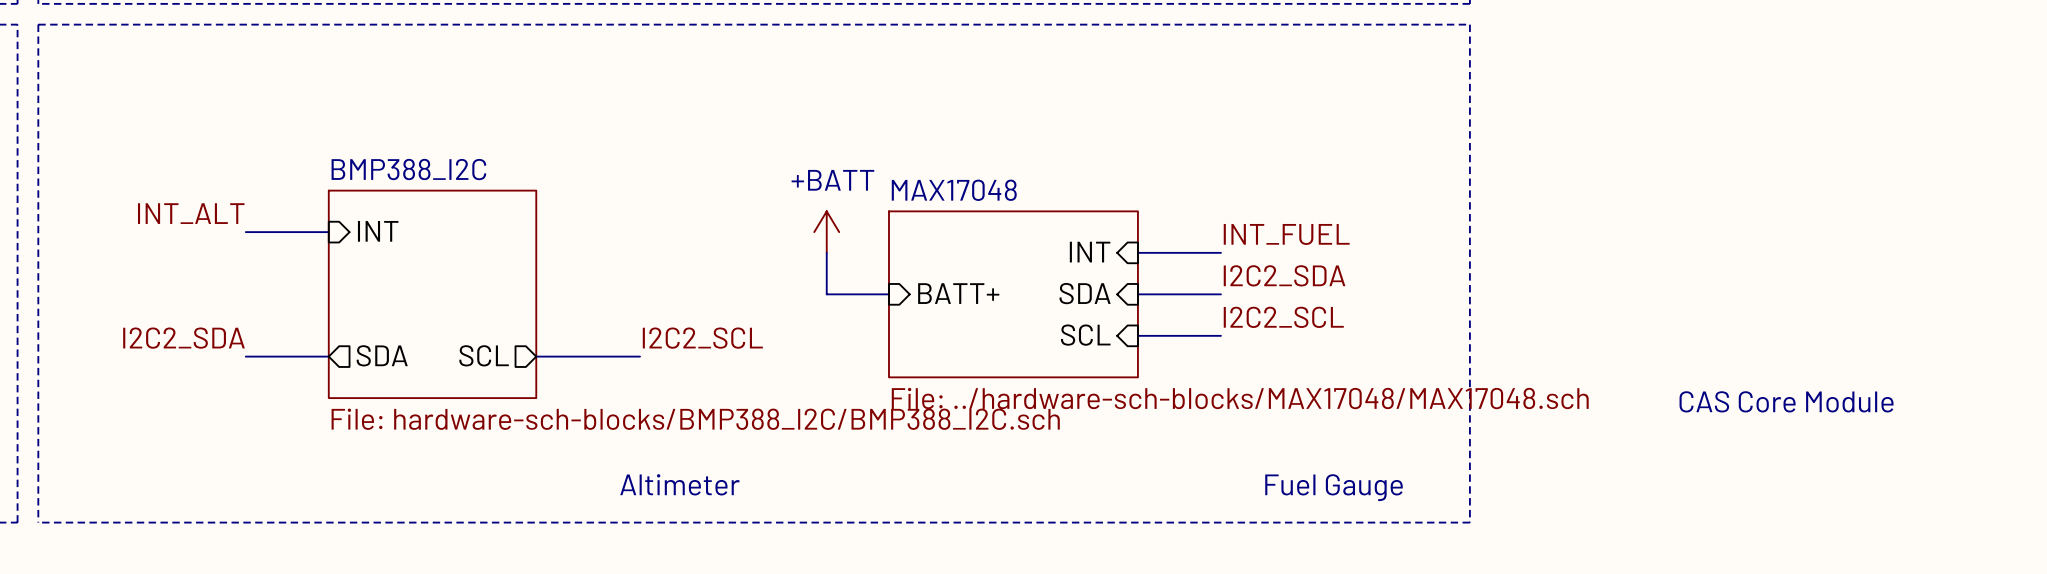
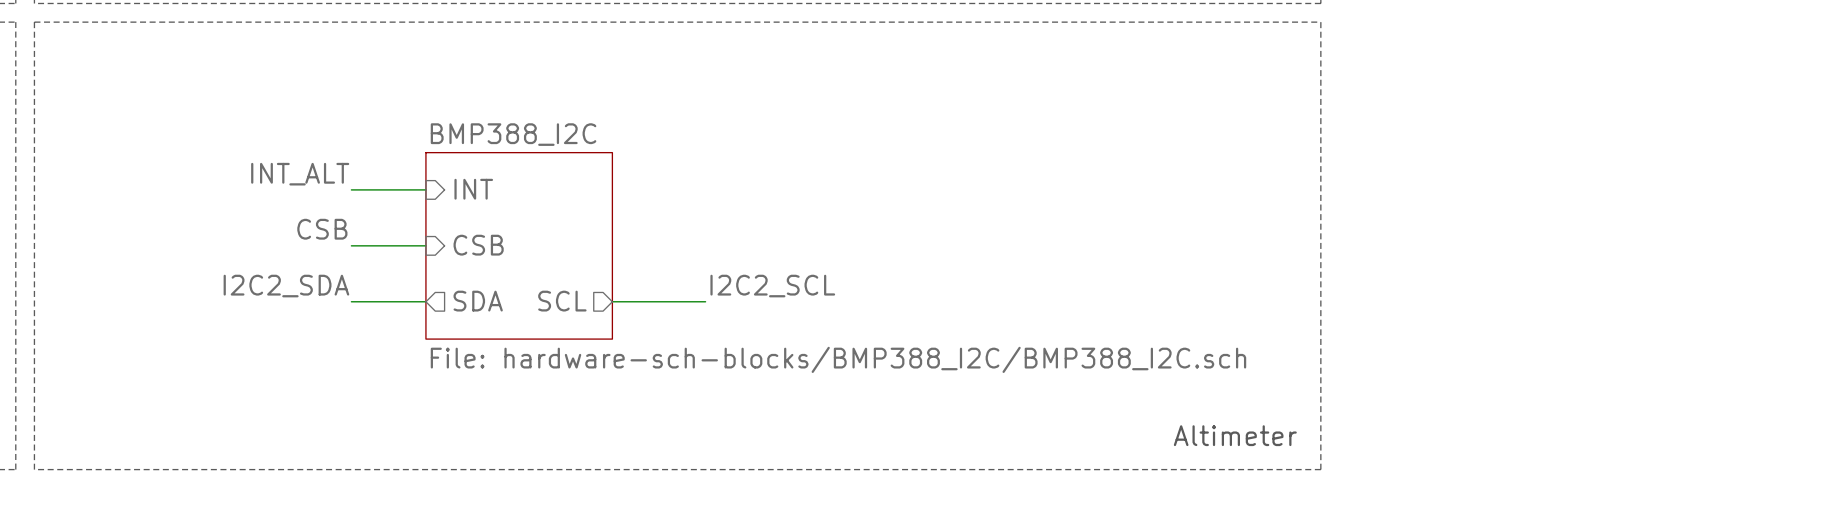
label position: INT_ALT (191, 213) -> INT_ALT (300, 174)
sheet pin position: INT (378, 231) -> INT (473, 189)
wire: (245, 232) (328, 232) -> (351, 189) (425, 189)
power symbol: +BATT (826, 232) -> none
label: INT_FUEL (1286, 234) -> none
wire: (826, 252) (826, 294) (888, 294) -> none
sheet pin: INT (1090, 252) -> none
wire: (1137, 252) (1220, 252) -> none
label: none -> CSB (322, 229)
sheet pin: none -> CSB (478, 245)
wire: none -> (351, 245) (425, 245)
label: I2C2_SDA (1284, 275) -> none
sheet pin: BATT+ (958, 293) -> none
sheet pin: SDA (1085, 293) -> none
sheet BMP388_I2C position: (432, 294) -> (519, 245)
sheet MAX17048: File: ../hardware-sch-blocks/MAX17048/MAX17048.sch (1013, 294) -> none
wire: (1137, 294) (1220, 294) -> none
label: I2C2_SCL (1283, 317) -> none
sheet pin: SCL (1085, 335) -> none
wire: (1137, 335) (1220, 335) -> none
label position: I2C2_SDA (183, 338) -> I2C2_SDA (286, 286)
label position: I2C2_SCL (702, 338) -> I2C2_SCL (772, 286)
sheet pin position: SDA (382, 355) -> SDA (478, 301)
sheet pin position: SCL (484, 355) -> SCL (562, 301)
wire: (245, 356) (328, 356) -> (351, 301) (425, 301)
wire: (536, 356) (640, 356) -> (612, 301) (705, 301)
text: CAS Core Module (1786, 401) -> none
text: Altimeter (679, 484) -> none
text: none -> Altimeter (1235, 435)
text: Fuel Gauge (1334, 487) -> none

